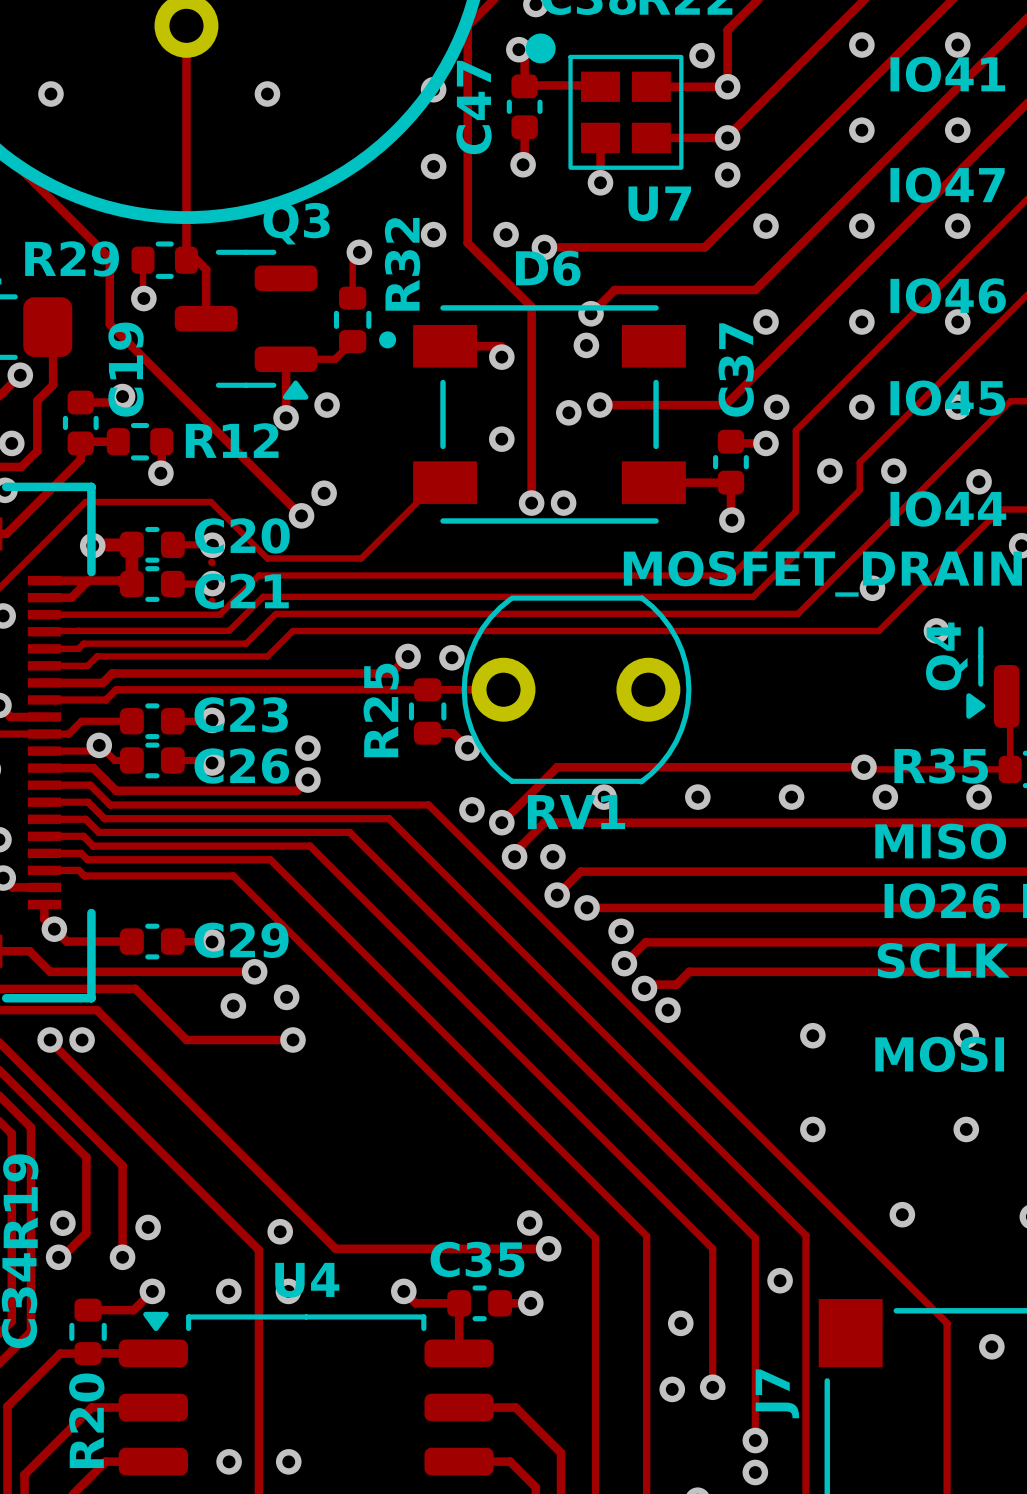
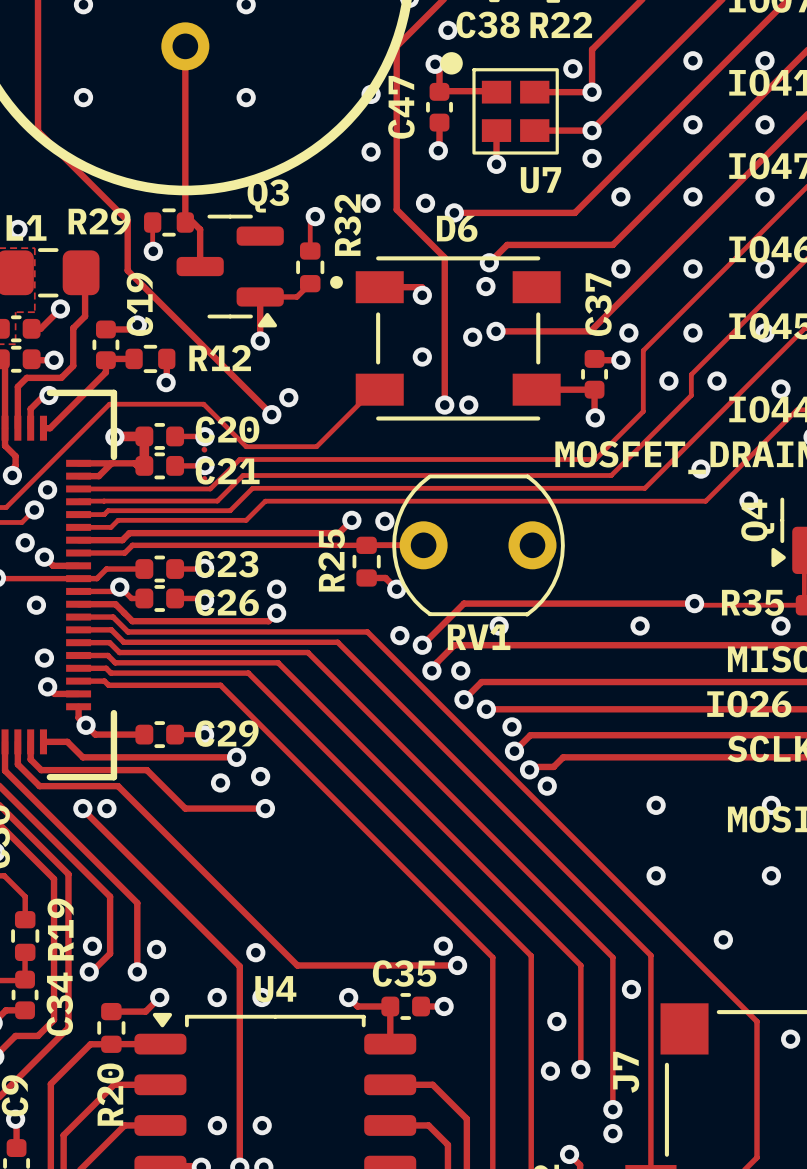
via: (327, 405) -> none
via: (697, 797) -> none
via: (885, 797) -> none

